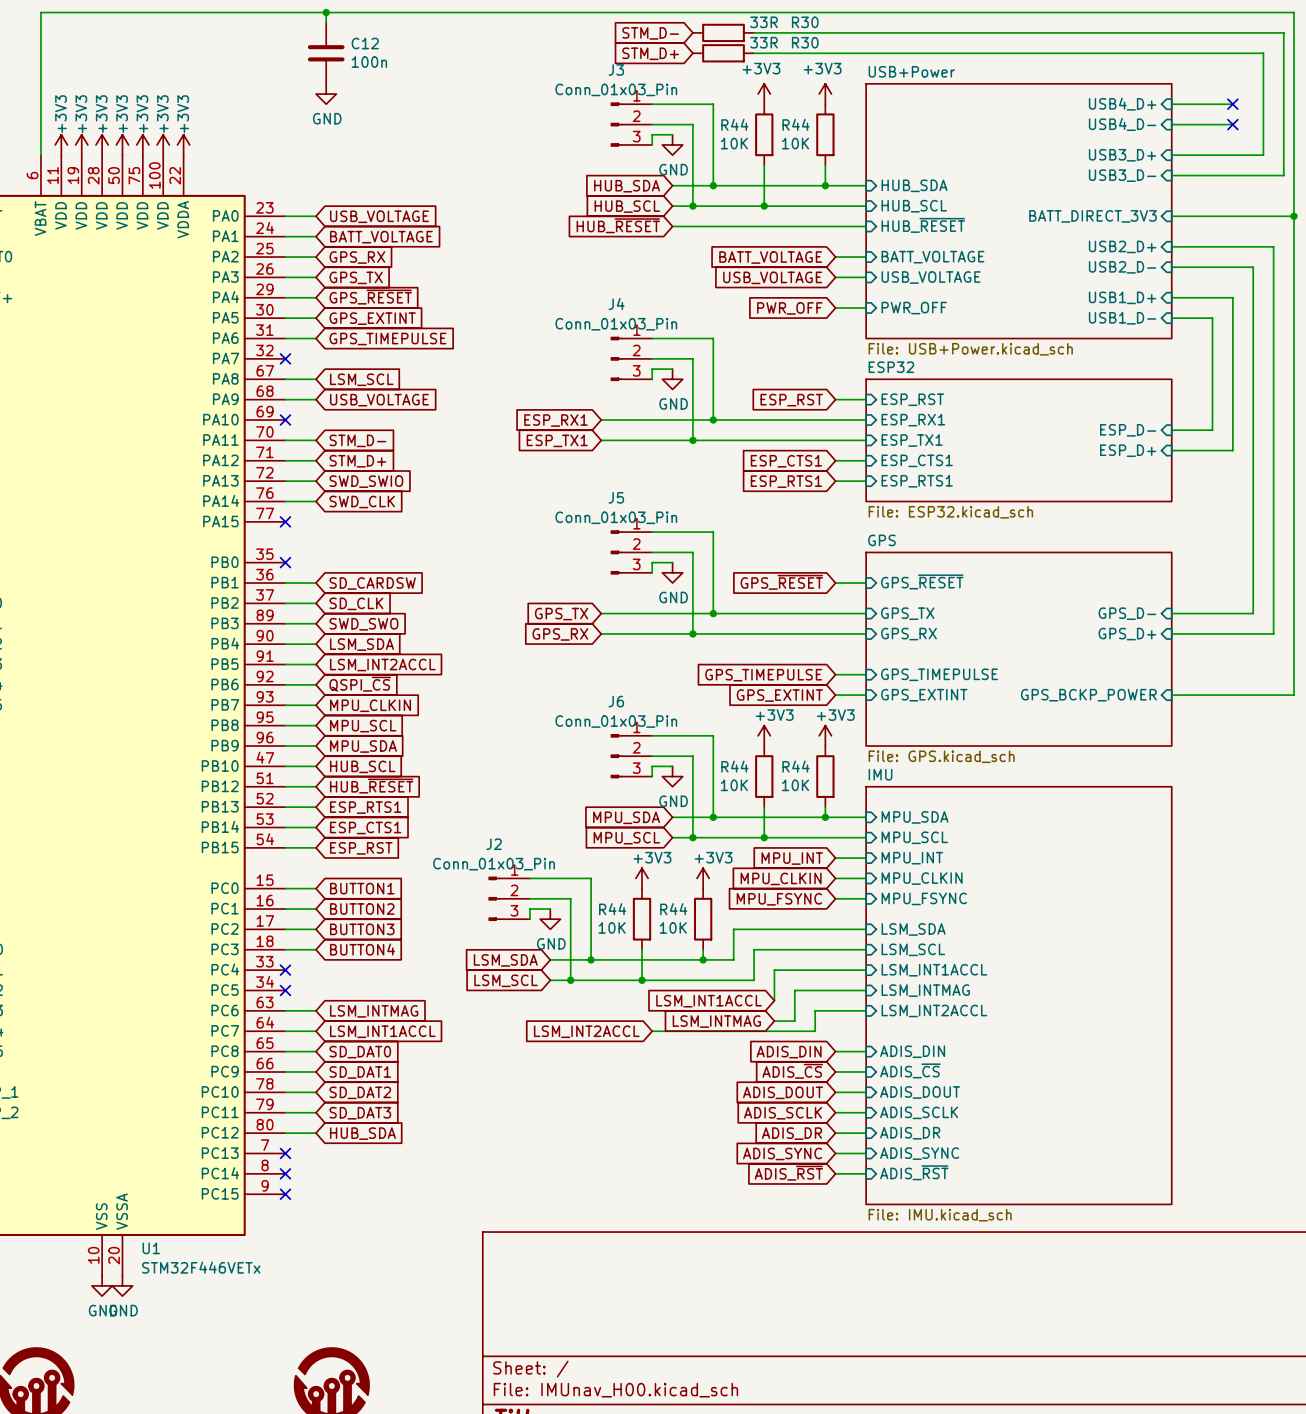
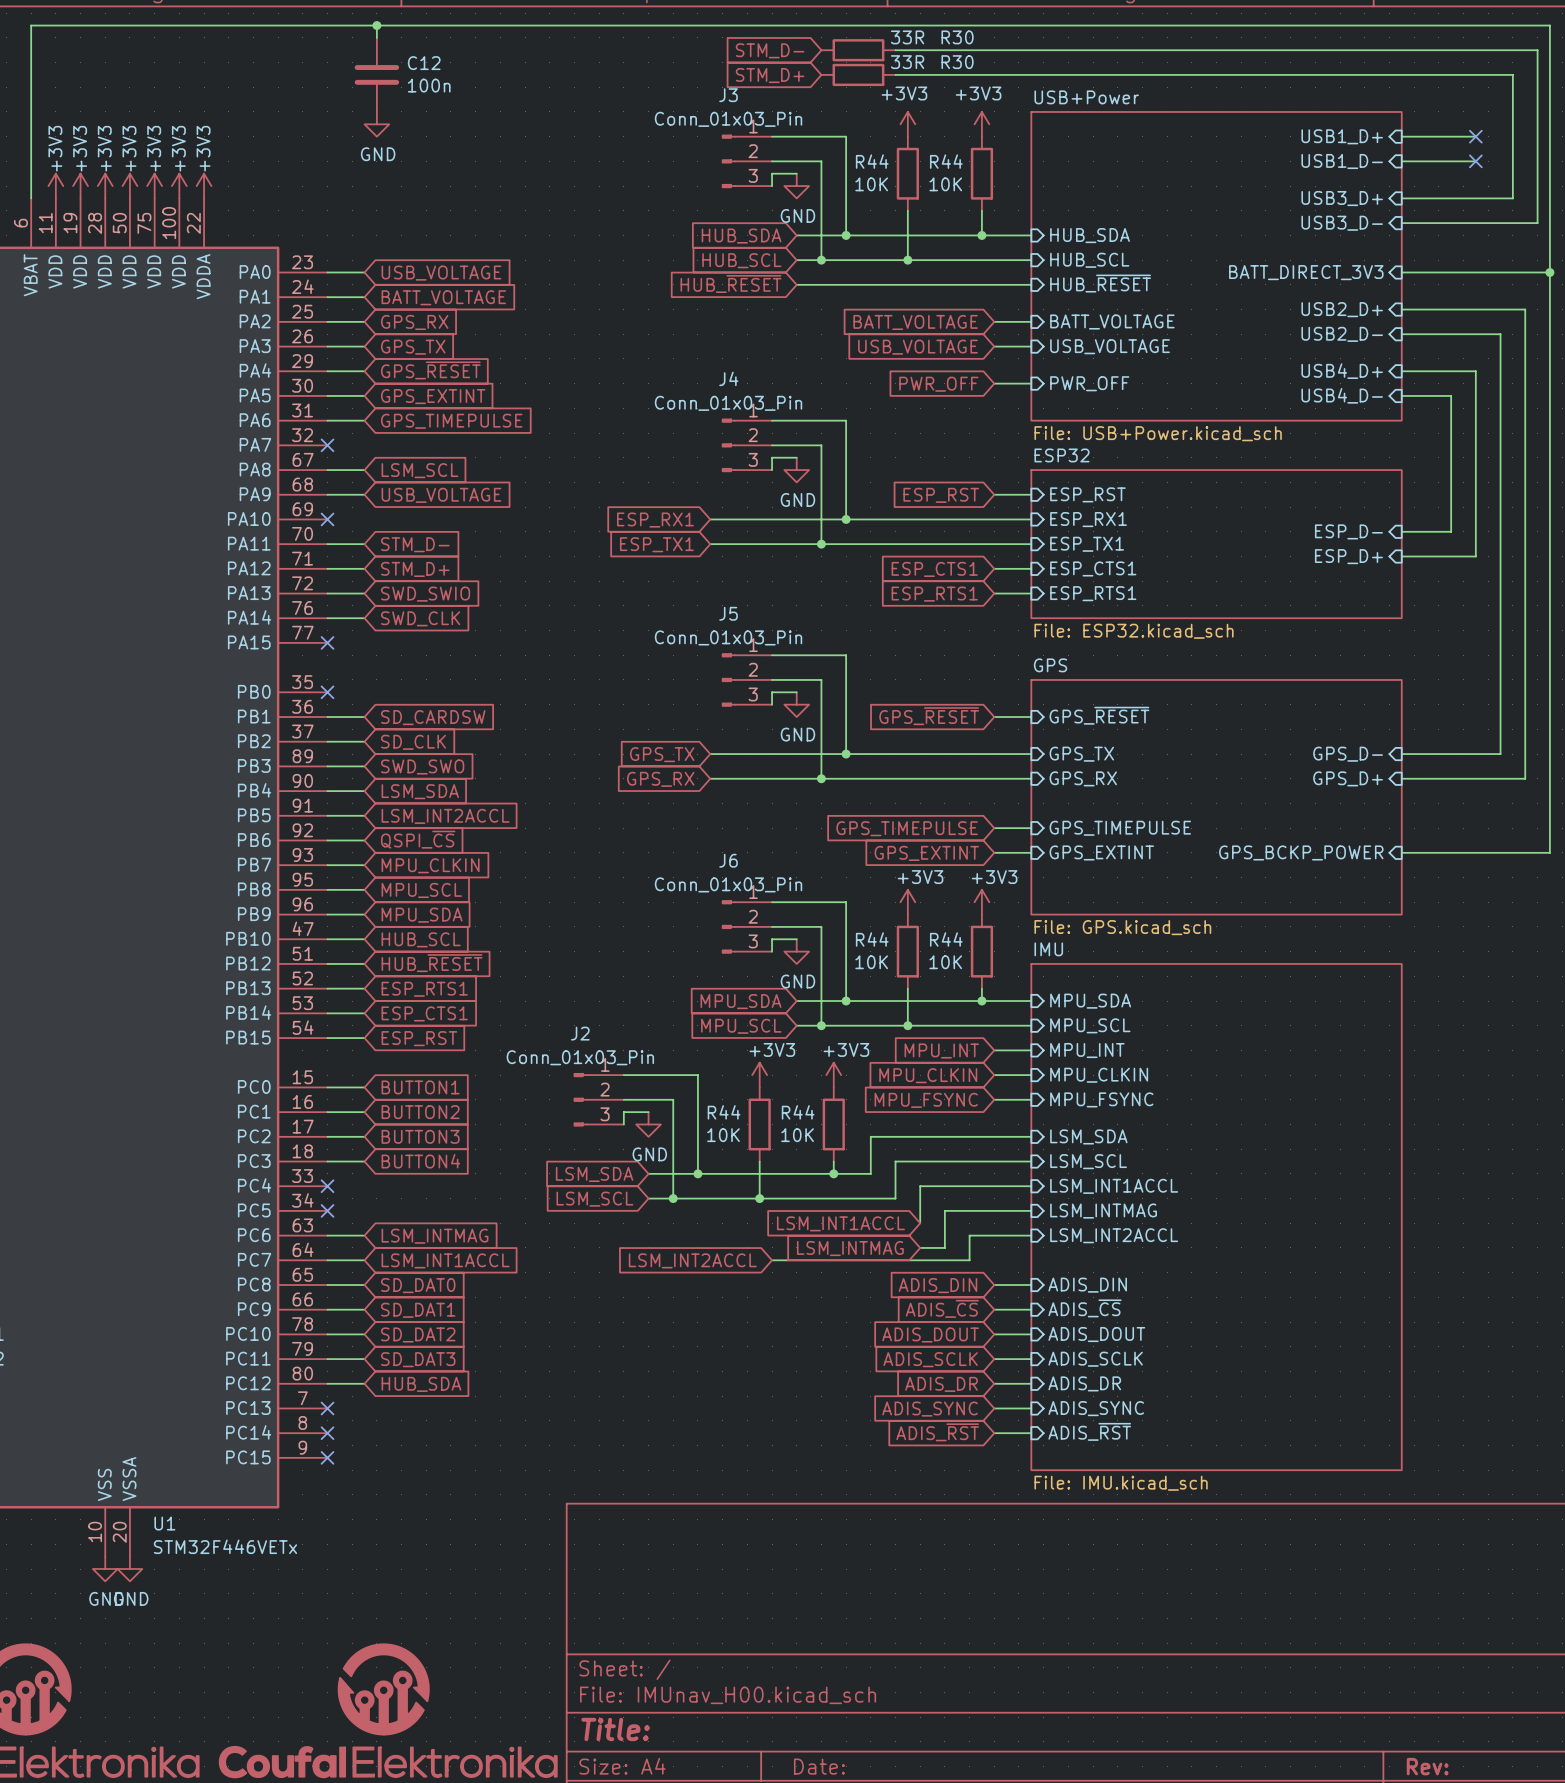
sheet pin: USB4_D+ (1122, 104) -> USB1_D+ (1342, 136)
sheet pin: USB4_D- (1122, 124) -> USB1_D- (1342, 161)
sheet pin: USB1_D+ (1122, 297) -> USB4_D+ (1342, 371)
sheet pin: USB1_D- (1122, 318) -> USB4_D- (1342, 395)

